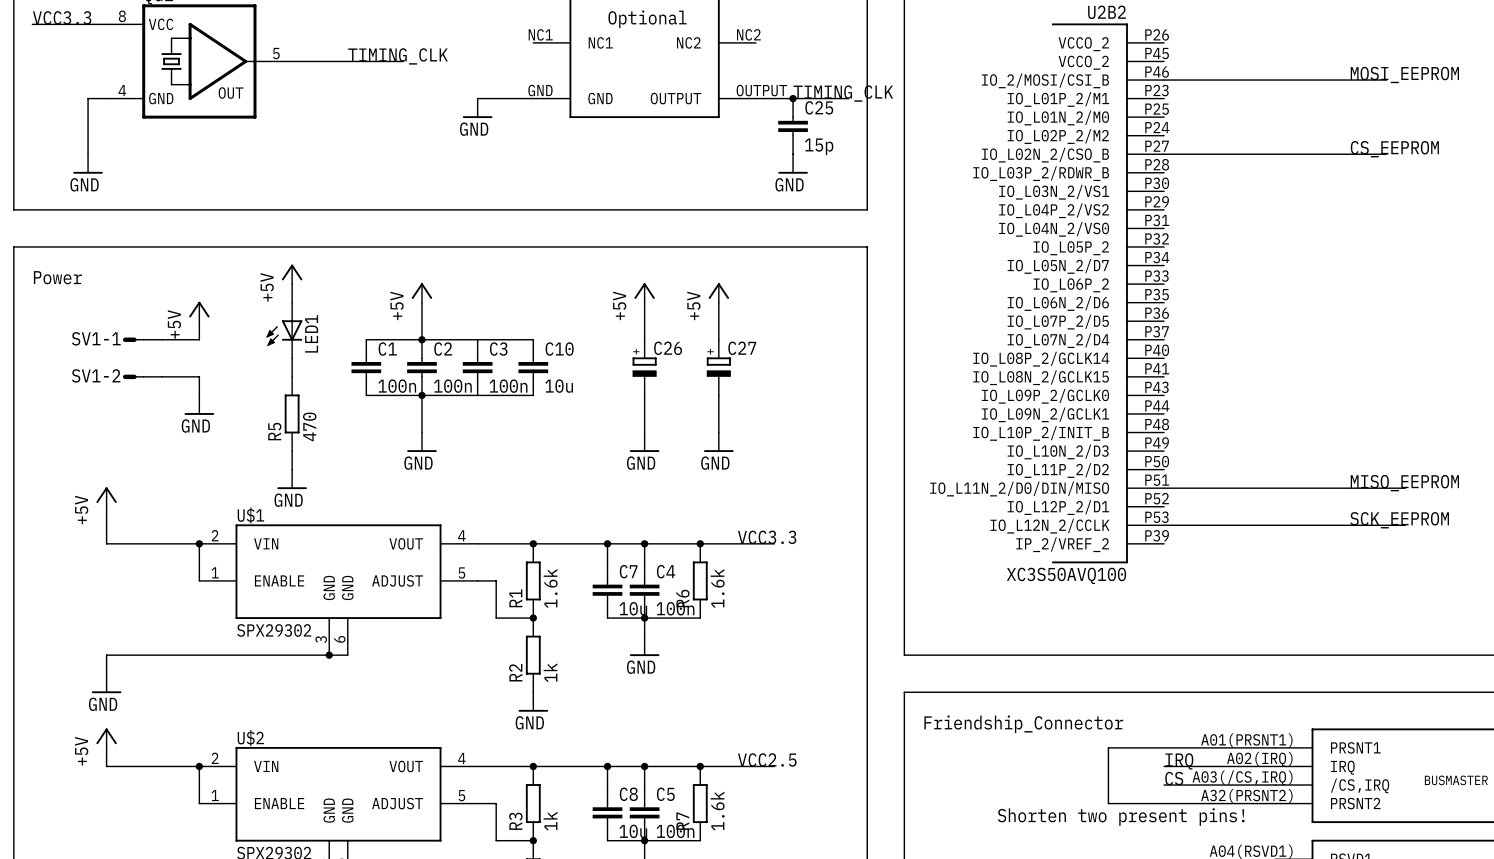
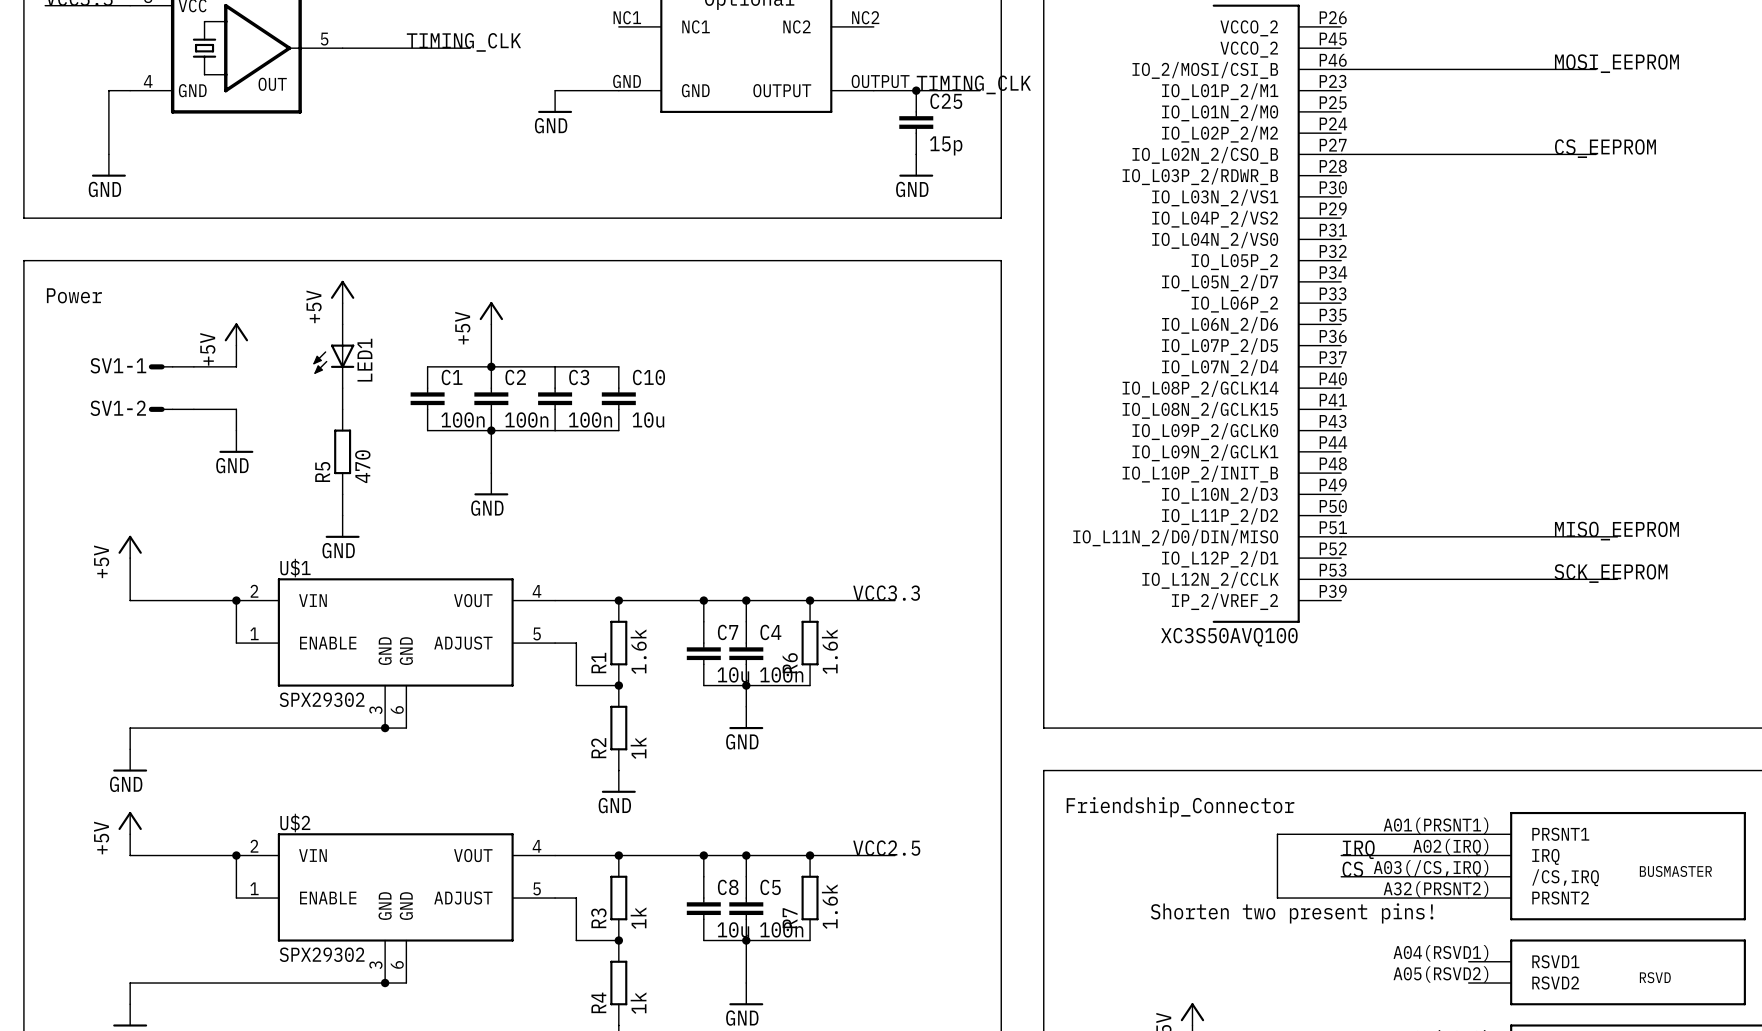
power symbol: +5V (644, 292) -> none
power symbol: +5V (718, 292) -> none
wire: (644, 302) (644, 339) -> none
wire: (718, 302) (718, 339) -> none
C26: (644, 367) -> none
C27: (718, 367) -> none
wire: (644, 395) (644, 432) -> none
wire: (718, 395) (718, 432) -> none
power symbol: GND (644, 442) -> none
power symbol: GND (718, 442) -> none

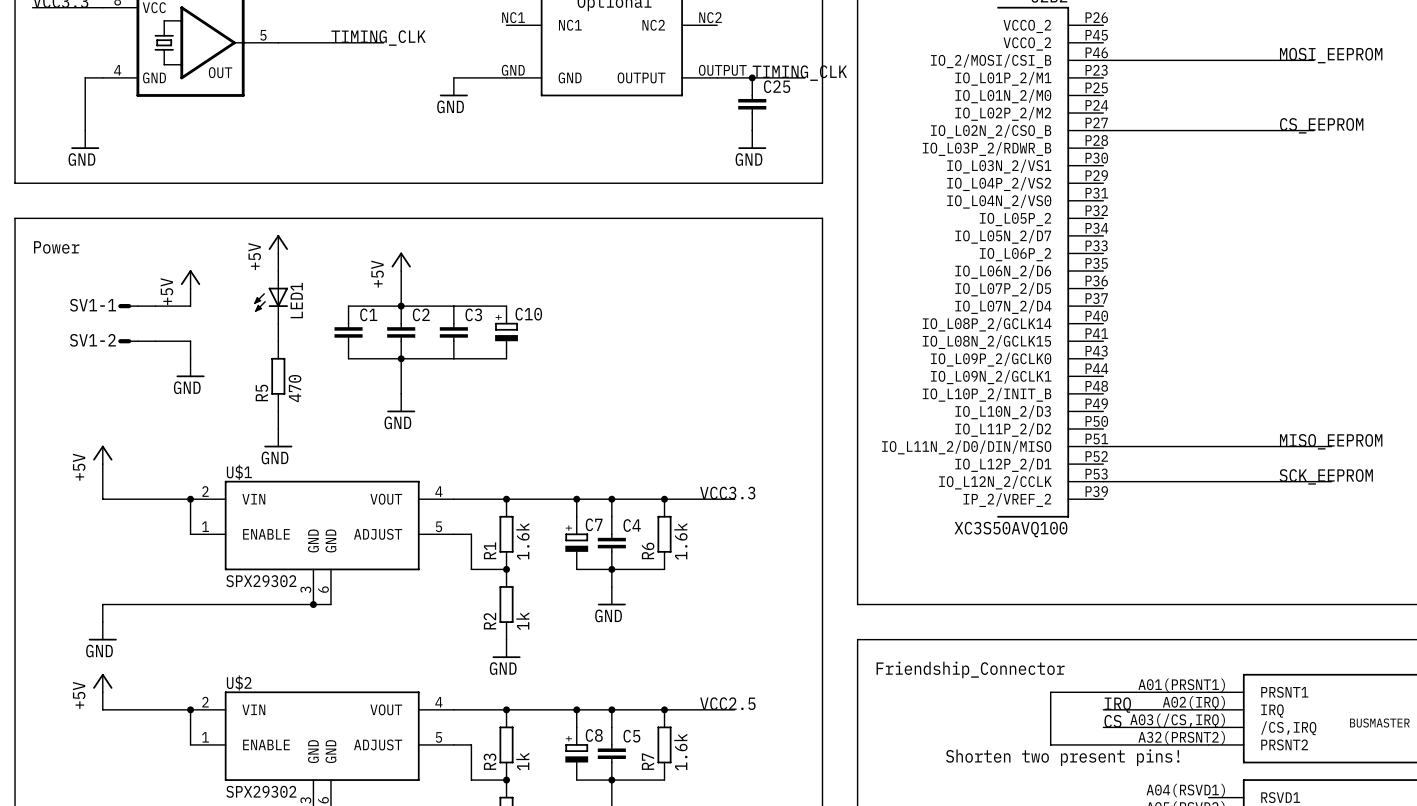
C25 value: 15p (946, 145) -> none
C10 symbol: [601, 366, 636, 431] -> [495, 306, 518, 359]
C1 value: 100n (462, 419) -> none
C2 value: 100n (526, 419) -> none
C3 value: 100n (590, 419) -> none
C10 value: 10u (648, 419) -> none
C7 symbol: [686, 621, 721, 686] -> [565, 516, 589, 570]
C7 value: 10u (733, 674) -> none
C4 value: 100n (781, 674) -> none
C8 symbol: [686, 876, 721, 941] -> [565, 727, 589, 781]
C8 value: 10u (733, 929) -> none
C5 value: 100n (781, 929) -> none

